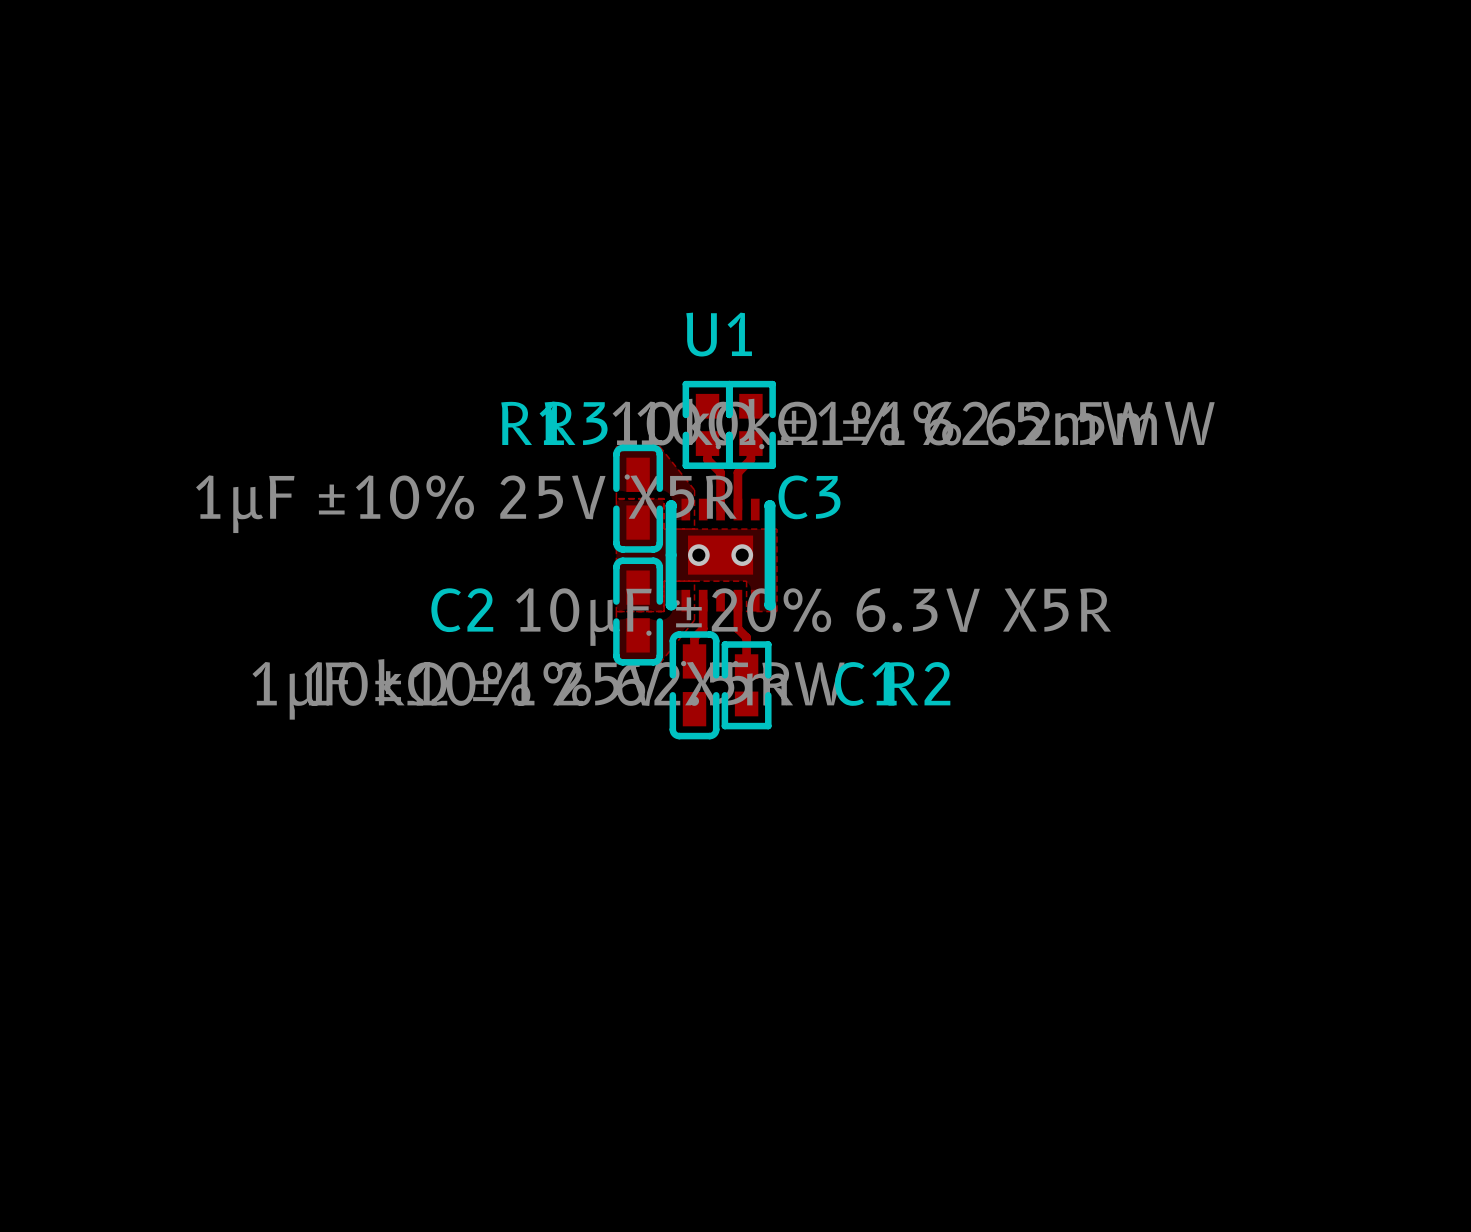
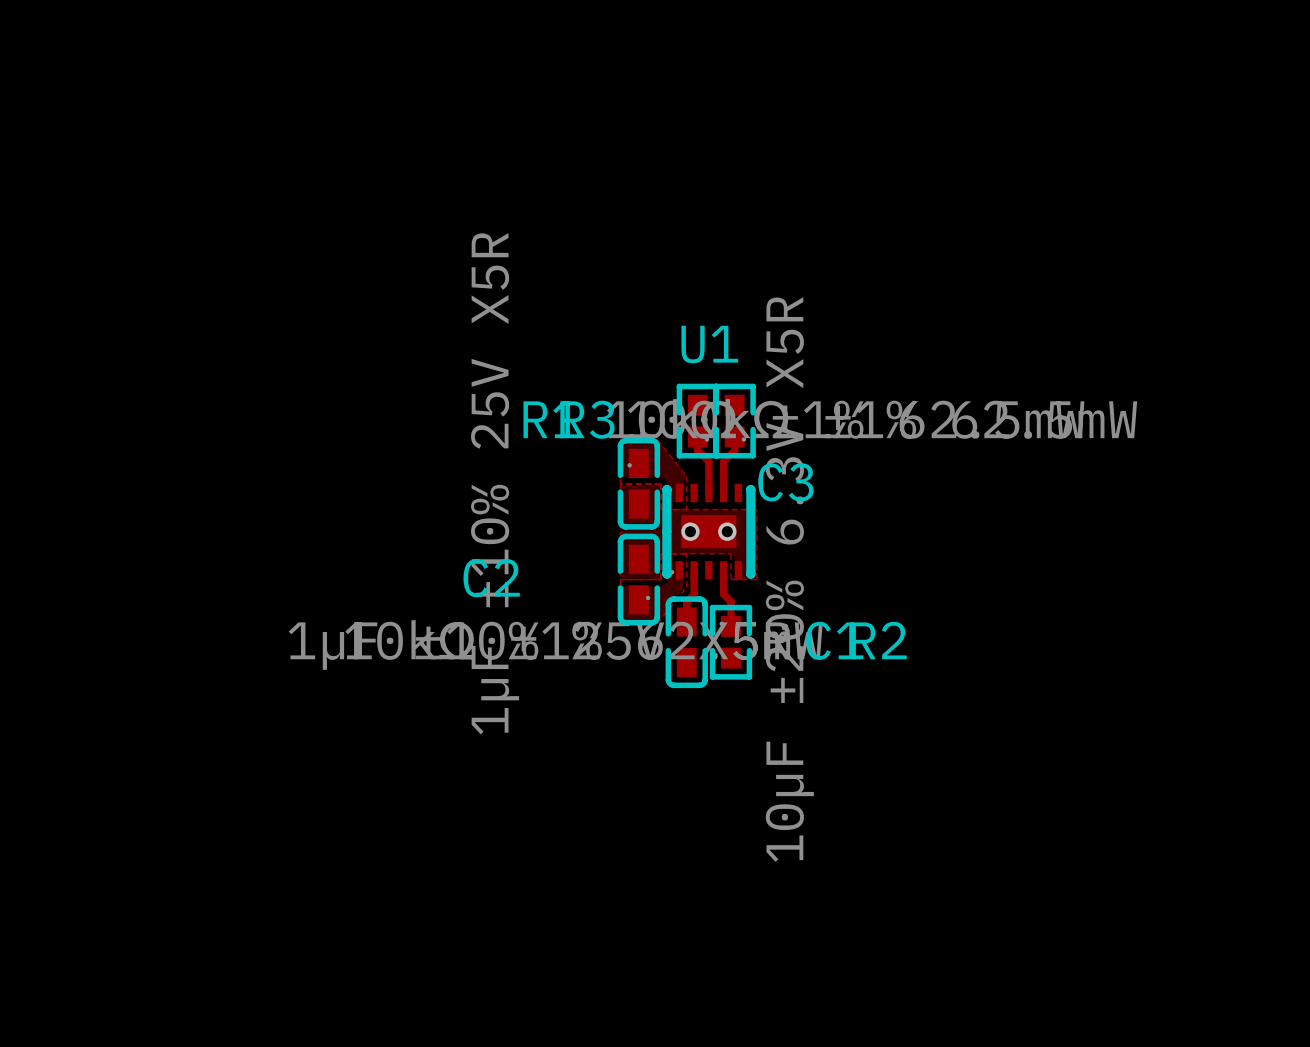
C3 value rotation: 0° (466, 504) -> 90° counterclockwise (495, 483)
C2 value rotation: 0° (813, 617) -> 90° counterclockwise (789, 579)

